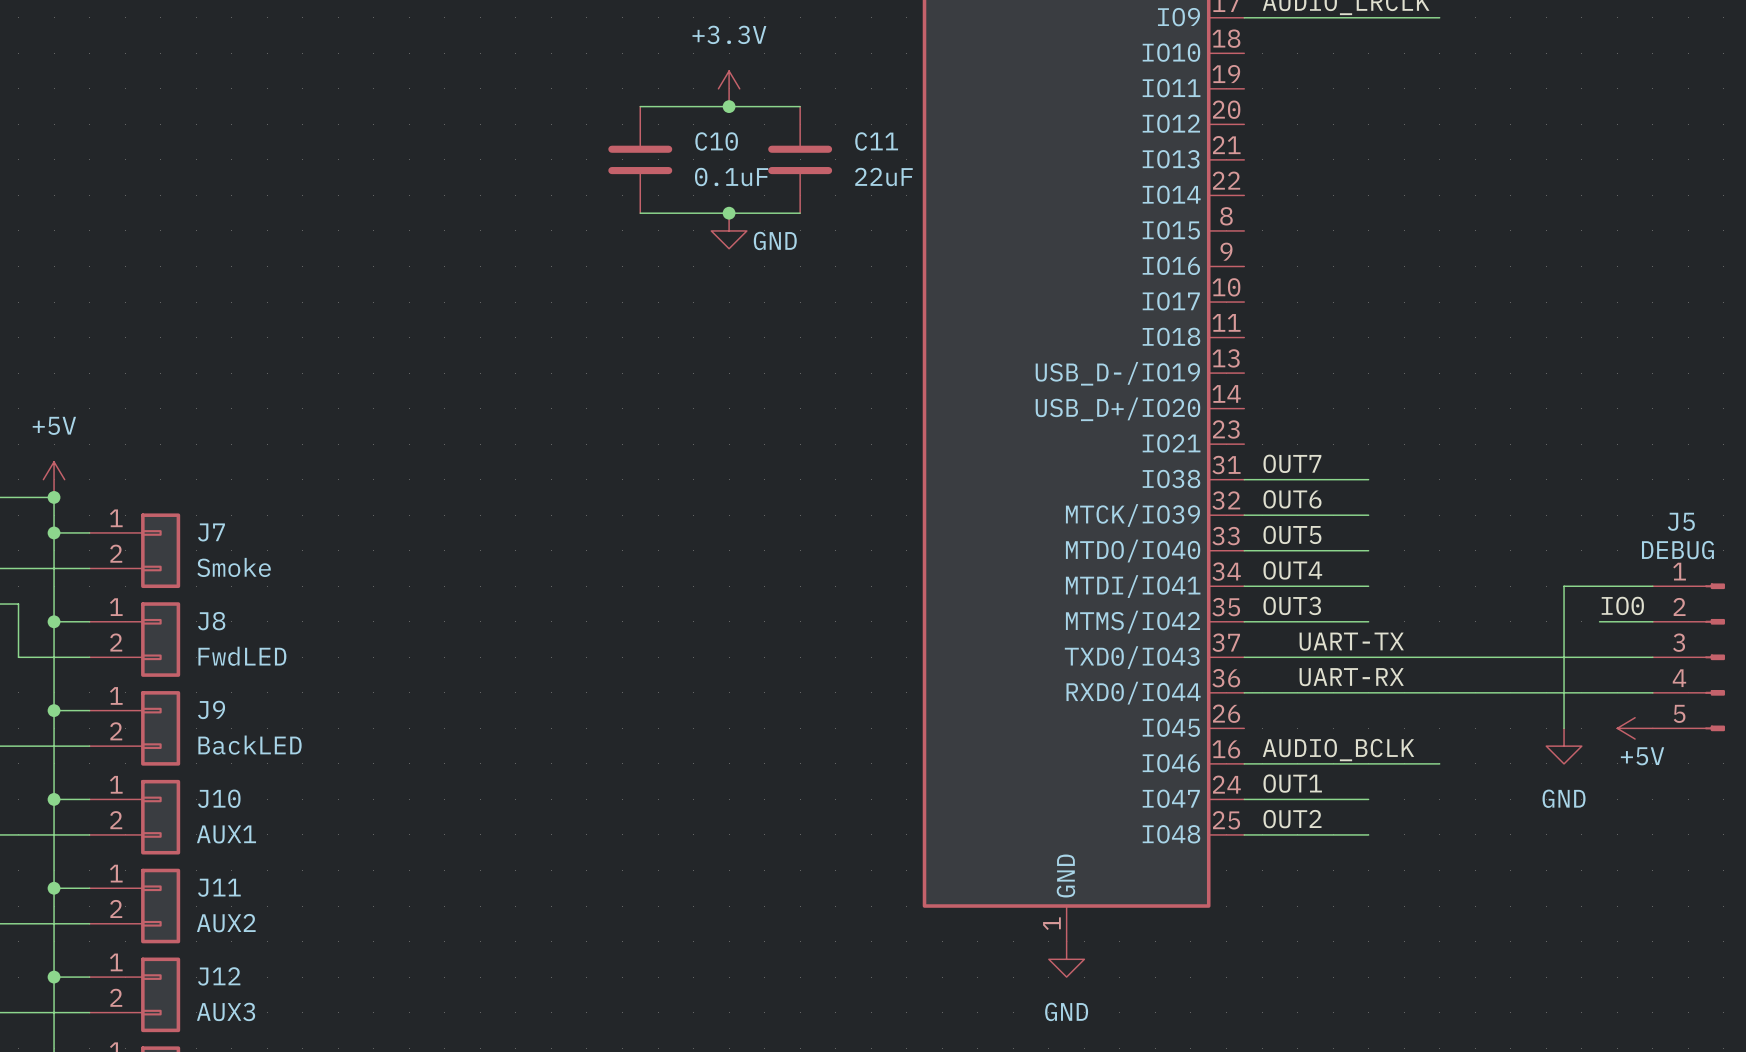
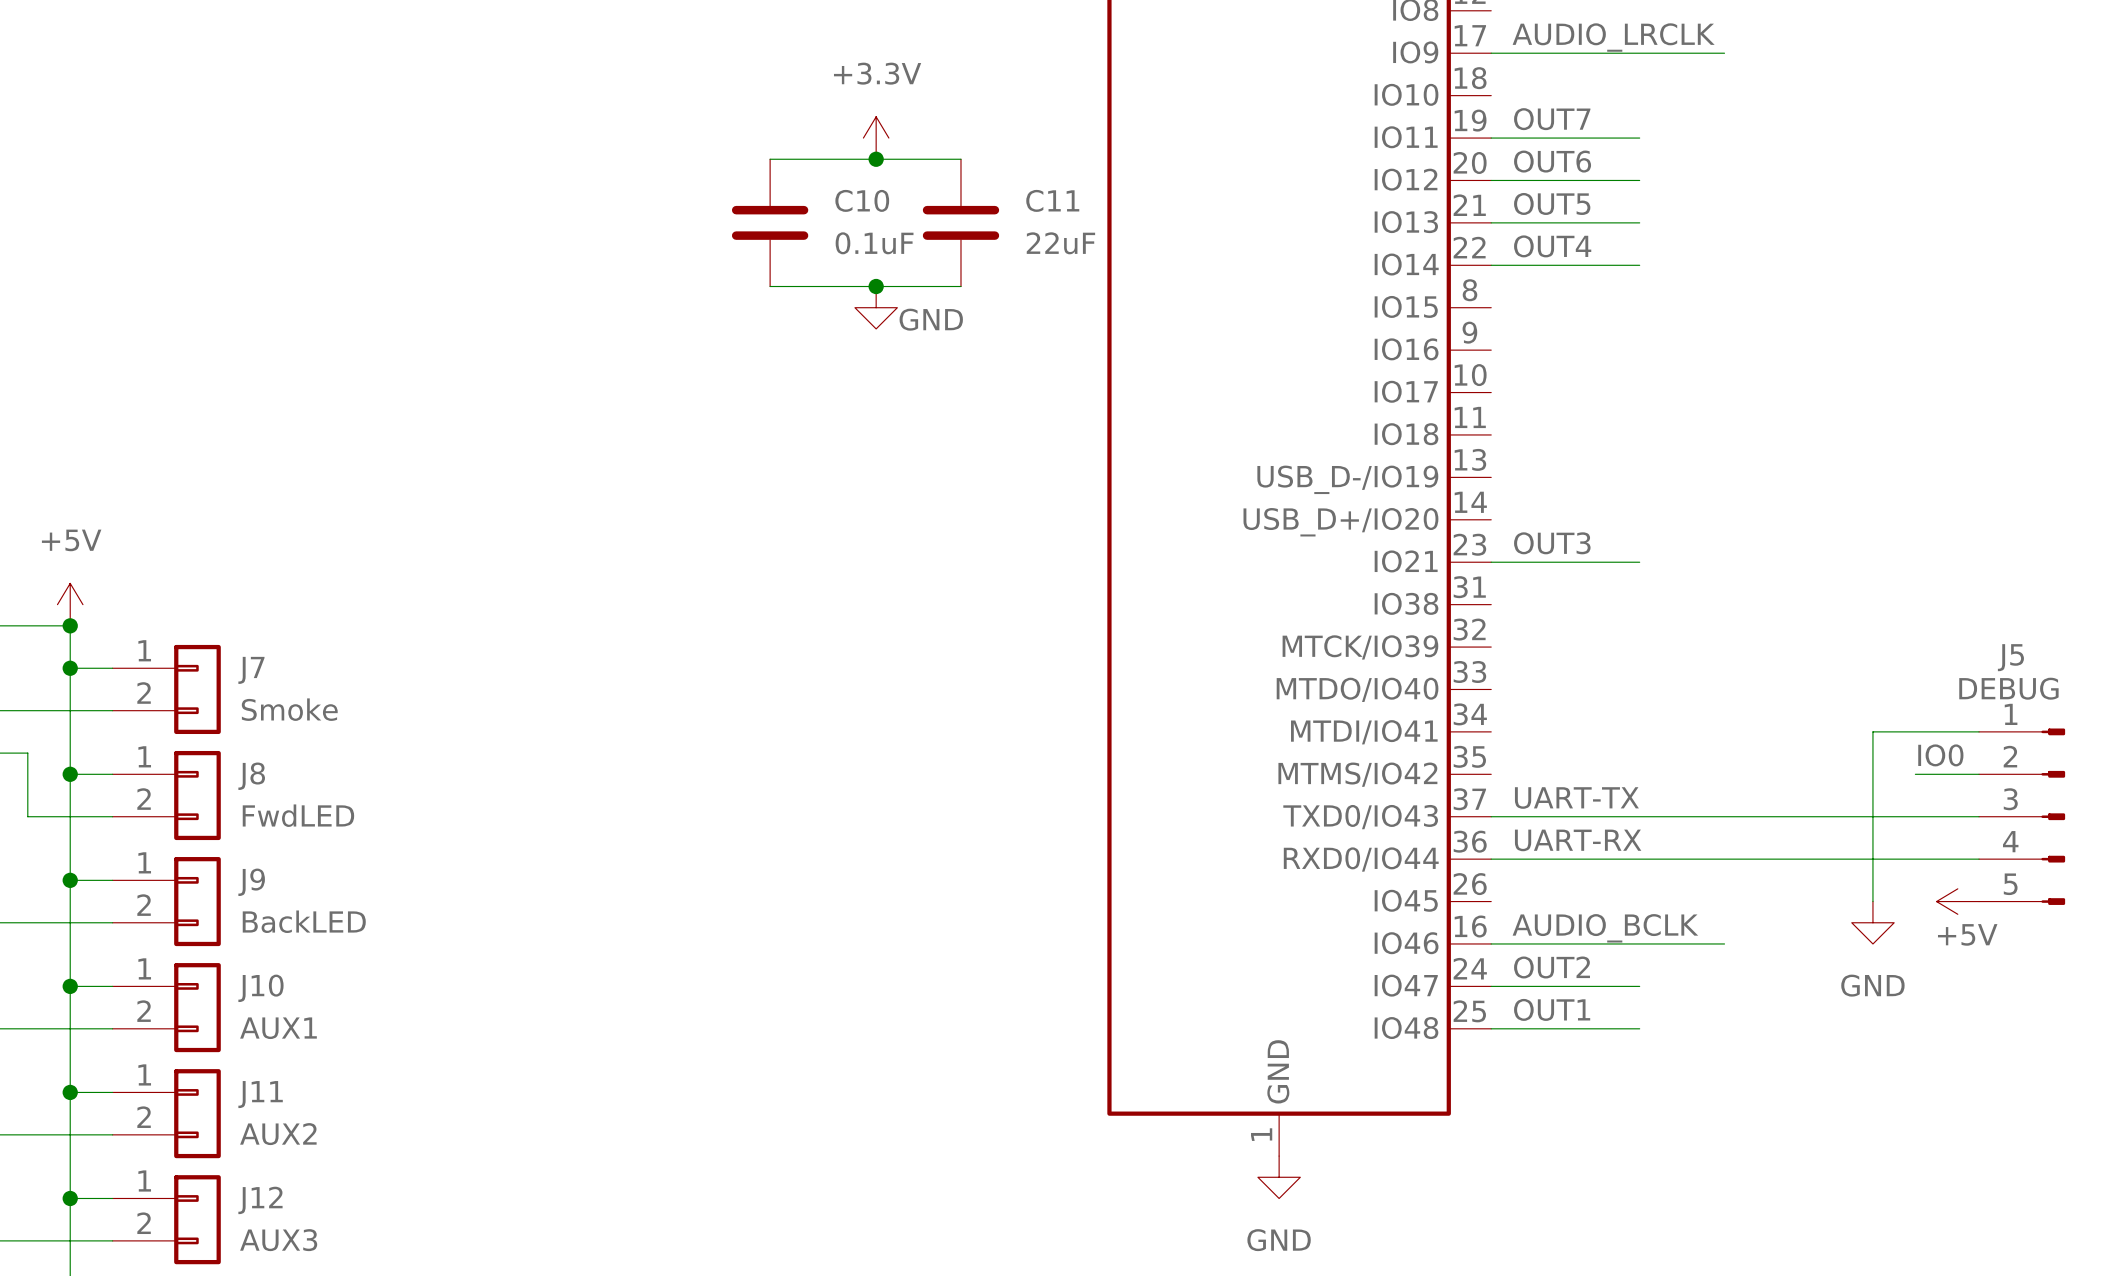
label: none -> OUT7 (1552, 119)
wire: none -> (1491, 138) (1639, 138)
label: none -> OUT6 (1552, 161)
wire: none -> (1491, 180) (1639, 180)
label: none -> OUT5 (1552, 203)
label: none -> OUT4 (1552, 246)
label: OUT7 (1292, 463) -> none
wire: (1244, 479) (1368, 479) -> (1491, 222) (1639, 222)
label: OUT6 (1292, 499) -> none
wire: (1244, 515) (1368, 515) -> (1491, 265) (1639, 265)
label: OUT5 (1292, 534) -> none
wire: (1244, 550) (1368, 550) -> (1491, 562) (1639, 562)
label: OUT4 (1292, 570) -> none
wire: (1244, 586) (1368, 586) -> none
label position: OUT3 (1292, 605) -> OUT3 (1552, 543)
wire: (1244, 621) (1368, 621) -> none
label position: UART-TX (1351, 641) -> UART-TX (1576, 798)
label position: UART-RX (1351, 677) -> UART-RX (1578, 840)
label: OUT1 (1292, 783) -> OUT2 (1552, 967)
label: OUT2 (1292, 819) -> OUT1 (1552, 1009)

